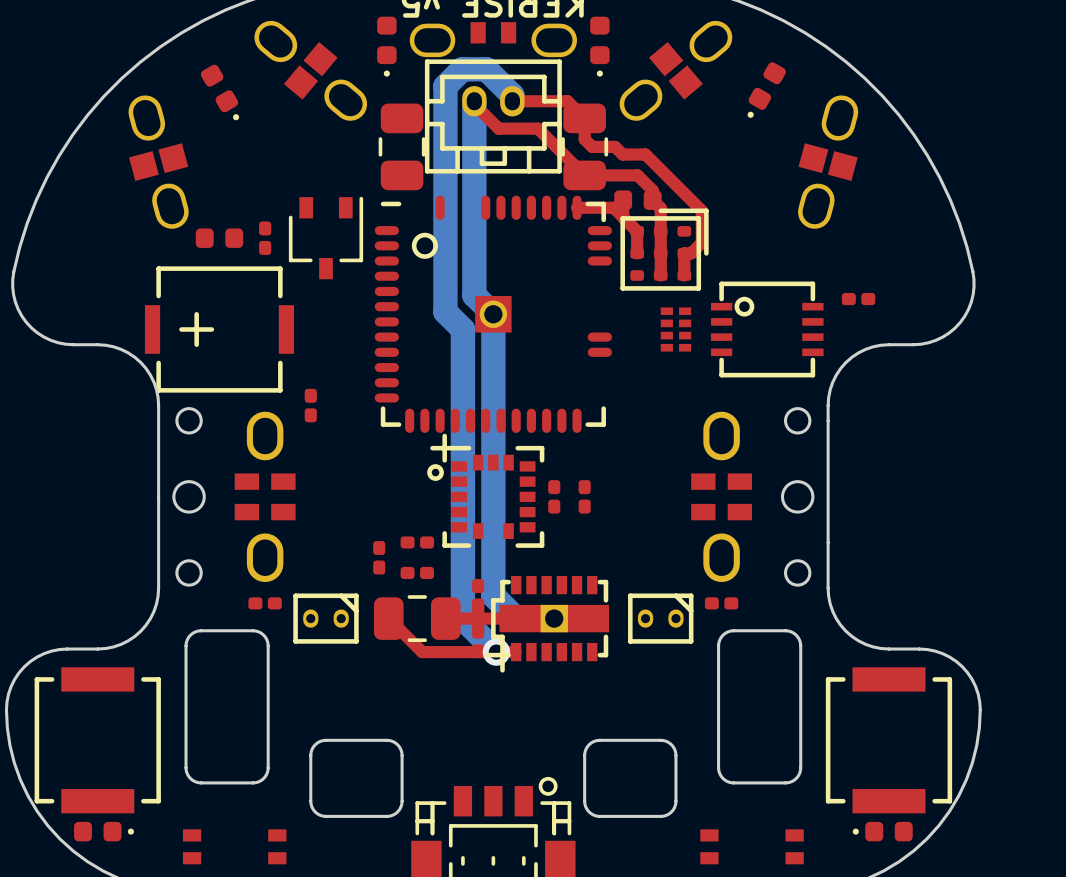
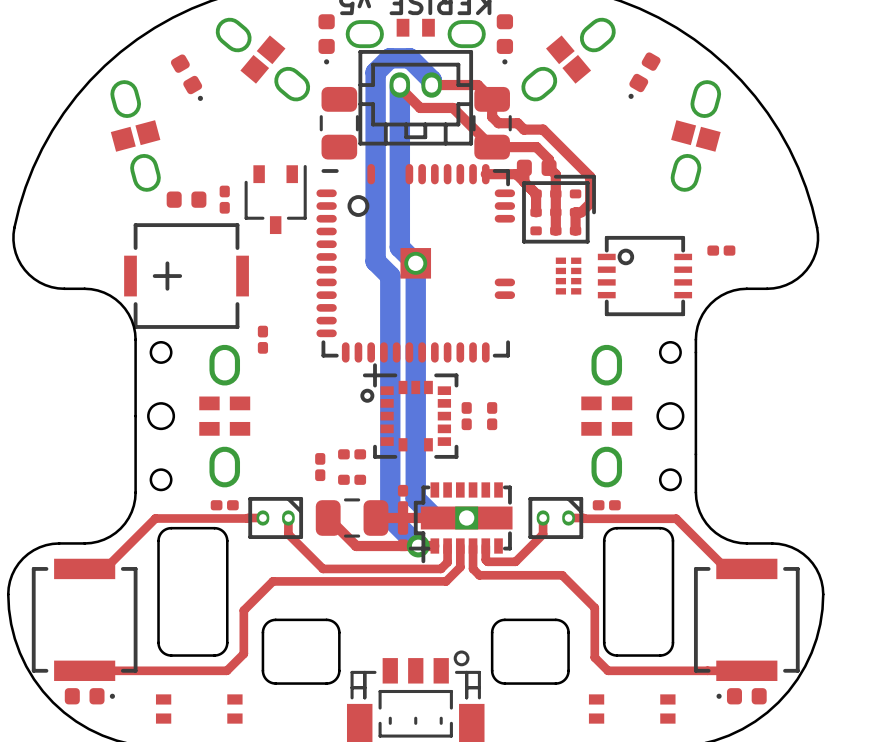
top track: none -> (262, 517) (155, 518) (105, 568) (84, 568)
top track: none -> (288, 517) (288, 534) (323, 568) (440, 568) (447, 562) (447, 546)
top track: none -> (543, 517) (543, 534) (515, 561) (487, 561) (485, 559) (485, 546)
top track: none -> (568, 517) (676, 518) (726, 568) (746, 568)
top track: none -> (460, 546) (460, 567) (446, 581) (272, 581) (243, 610) (243, 653) (226, 670) (84, 670)
top track: none -> (473, 546) (473, 568) (479, 575) (562, 575) (594, 607) (594, 657) (608, 670) (746, 670)

